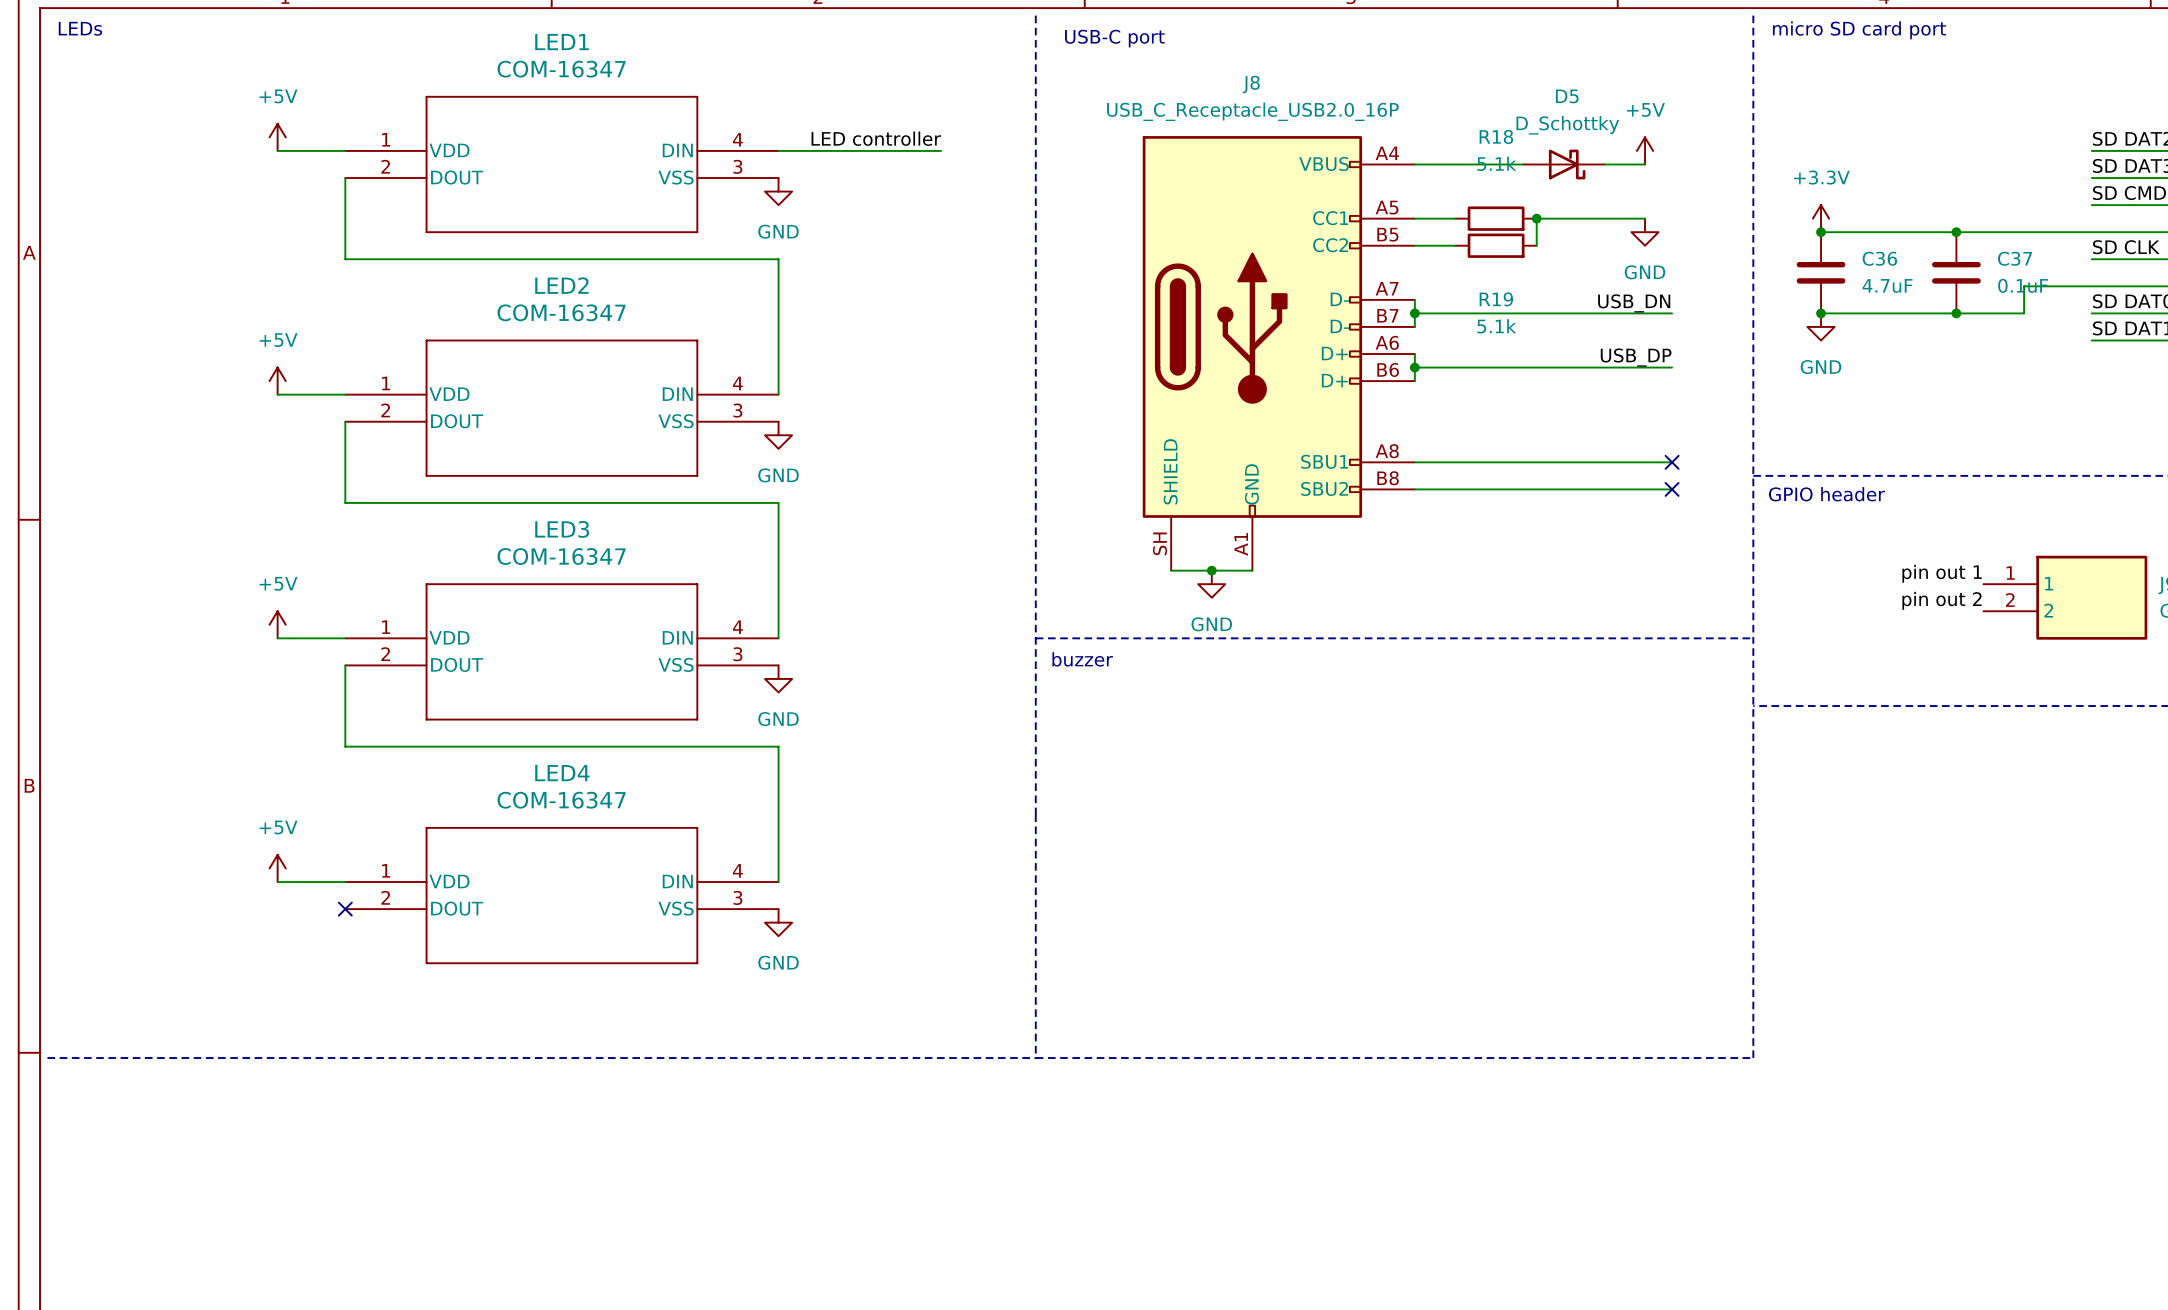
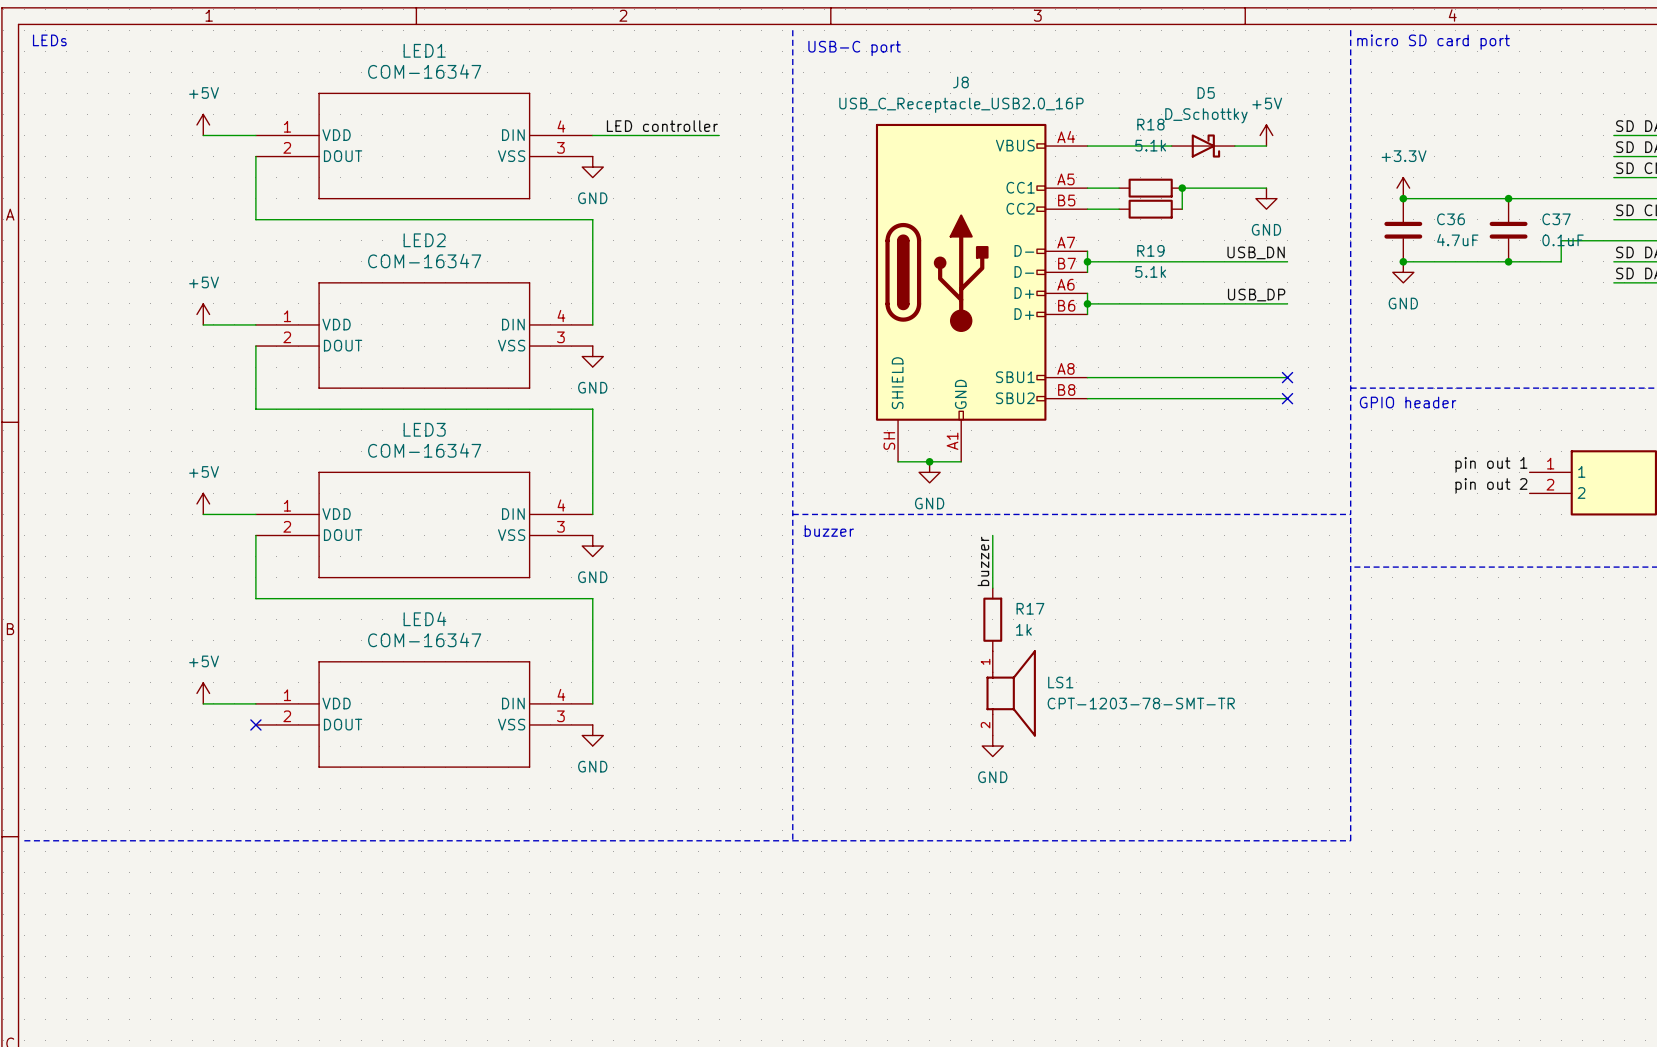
wire: none -> (992, 535) (992, 588)
label: none -> buzzer (983, 561)
R17: none -> 1k (992, 619)
LS1: none -> CPT-1203-78-SMT-TR (1011, 693)
power symbol: none -> GND (992, 746)

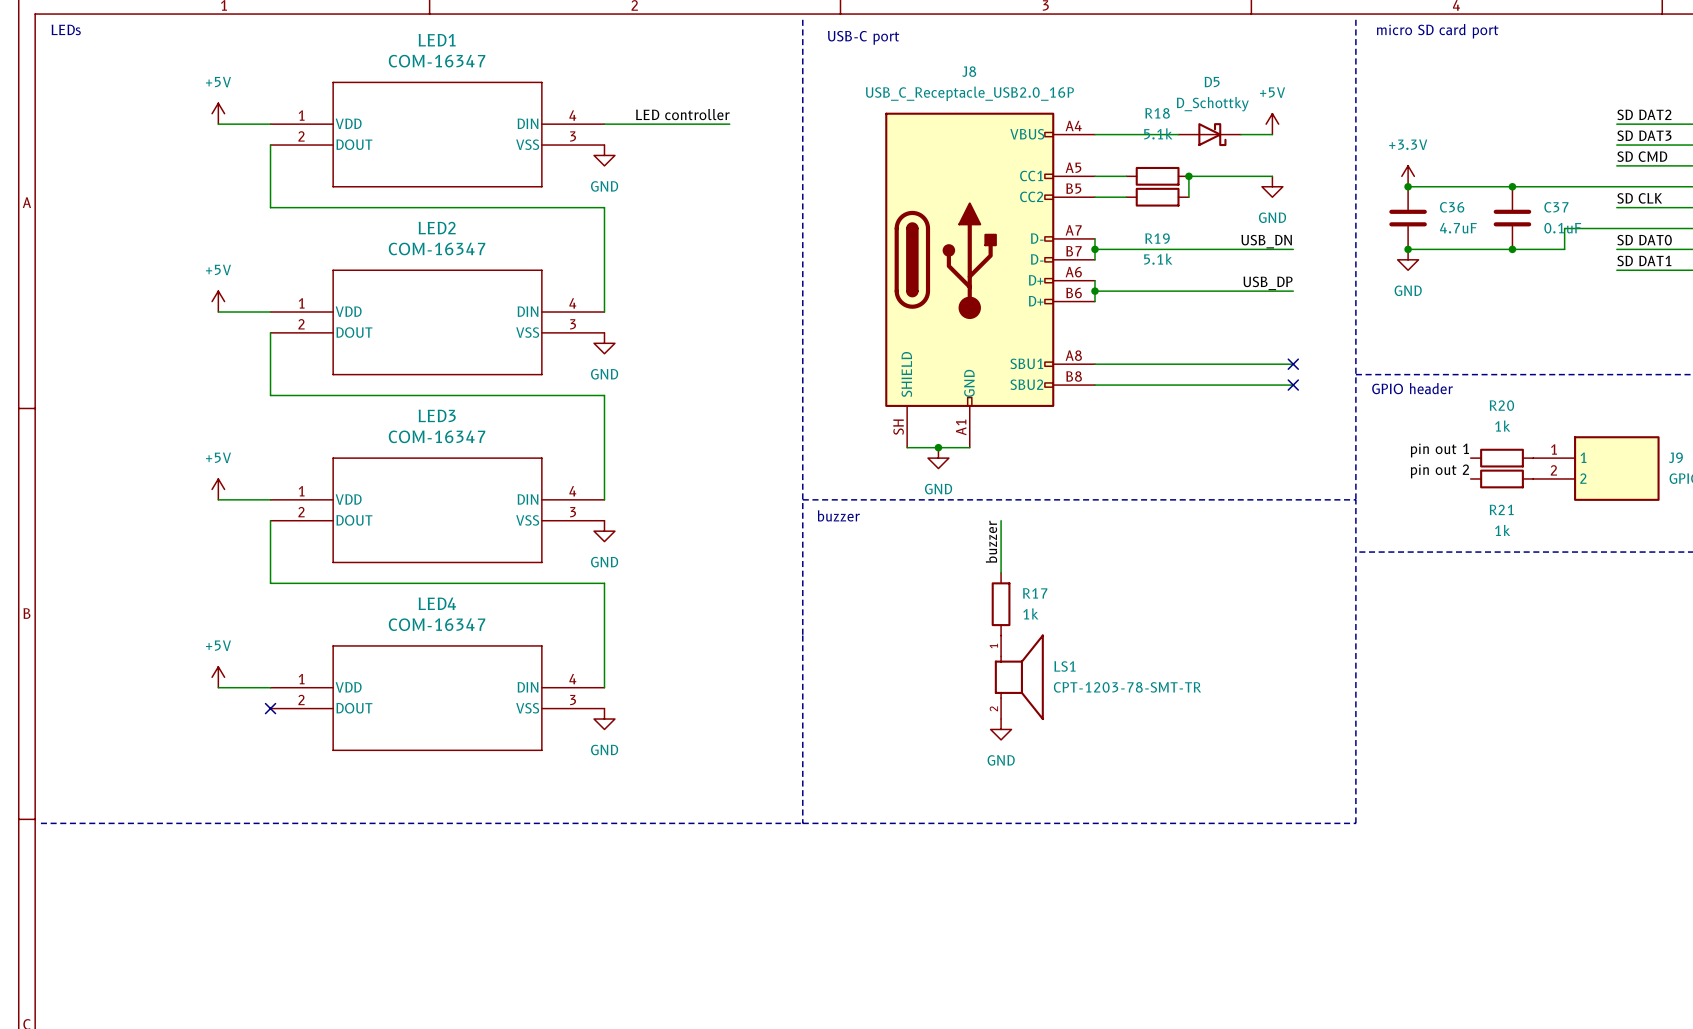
label position: pin out 1 (1491, 464) -> pin out 1 (1439, 450)
R20: none -> 1k (1502, 458)
label position: pin out 2 (1491, 485) -> pin out 2 (1439, 471)
R21: none -> 1k (1502, 478)

